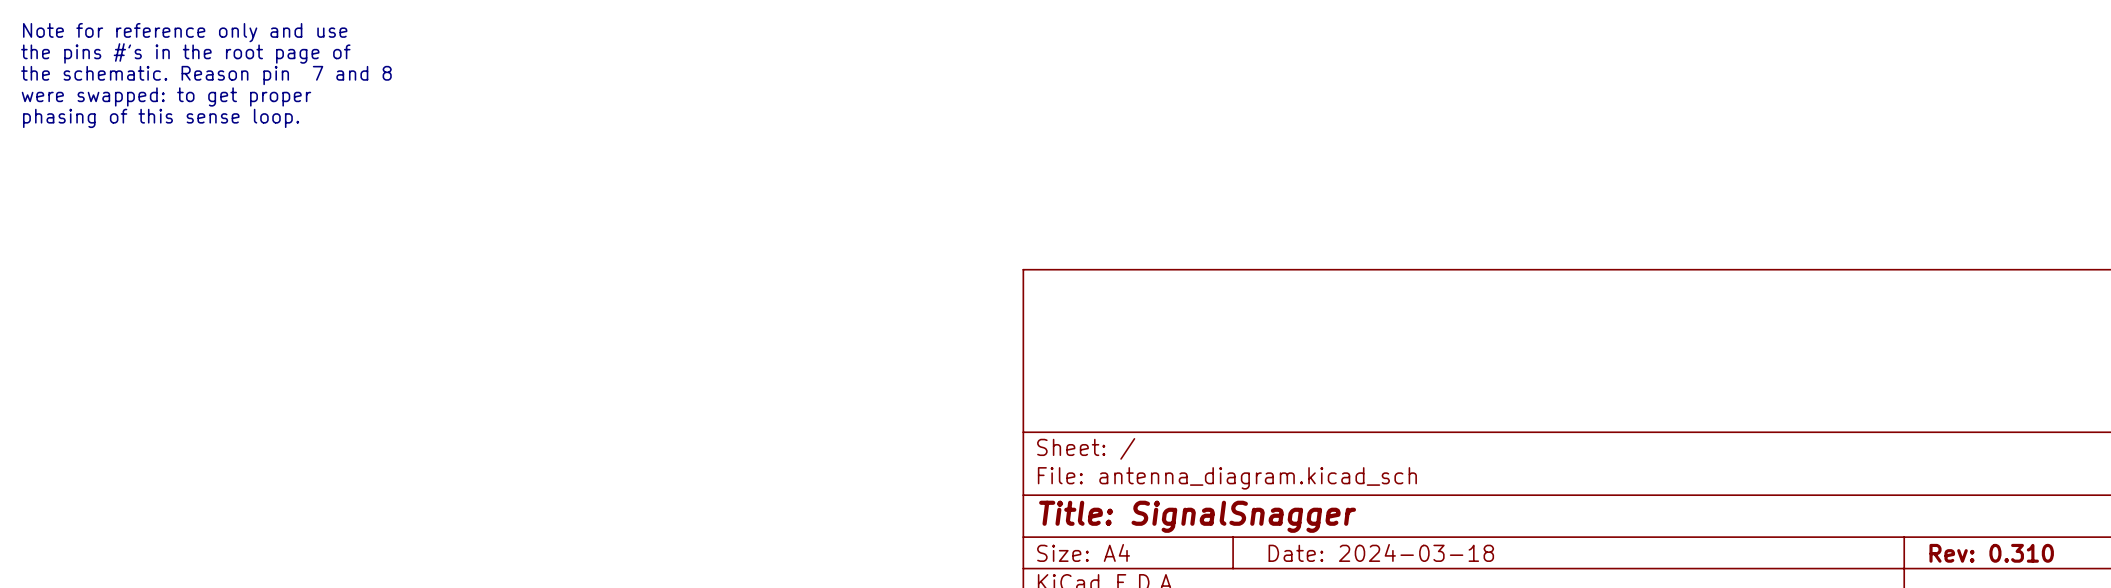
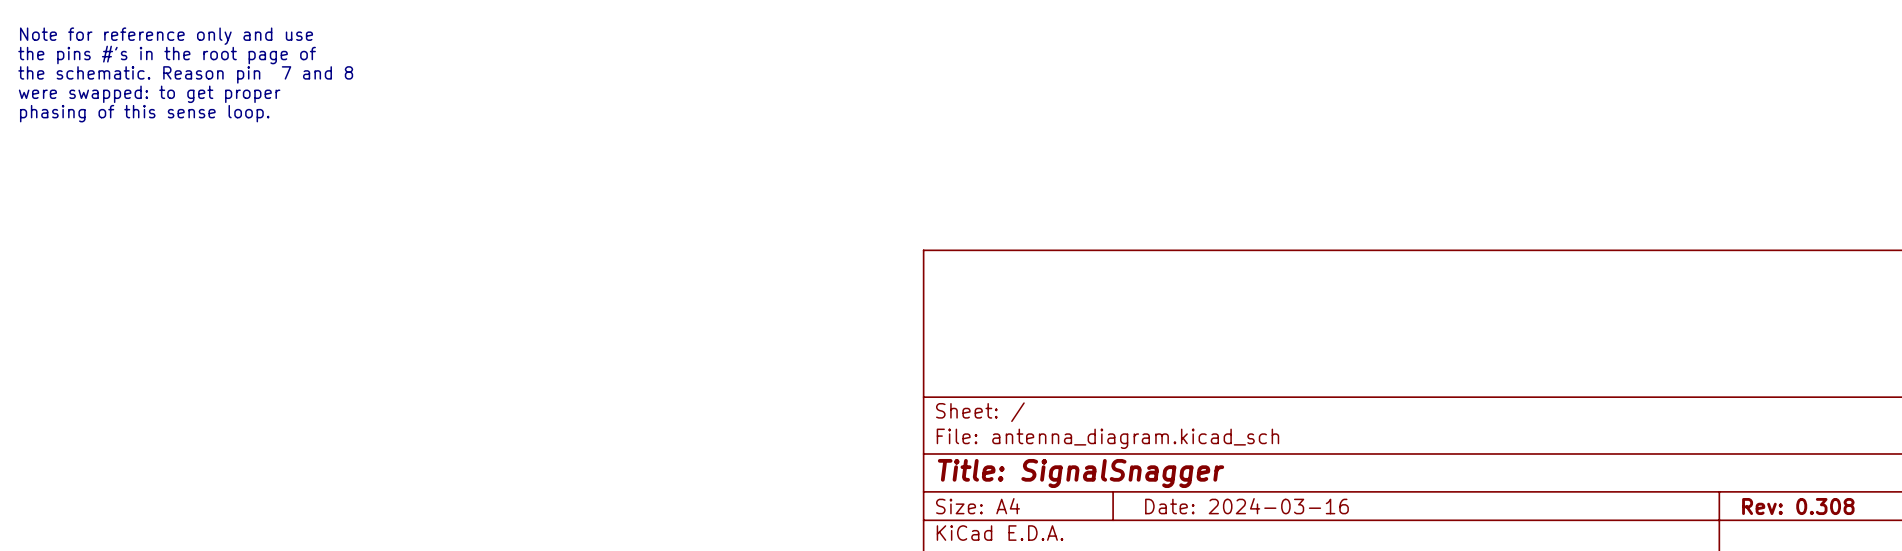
title block: Date: 2024-03-18 (1381, 552) -> Date: 2024-03-16 (1246, 506)
title block: Rev: 0.310 (1991, 553) -> Rev: 0.308 (1798, 506)

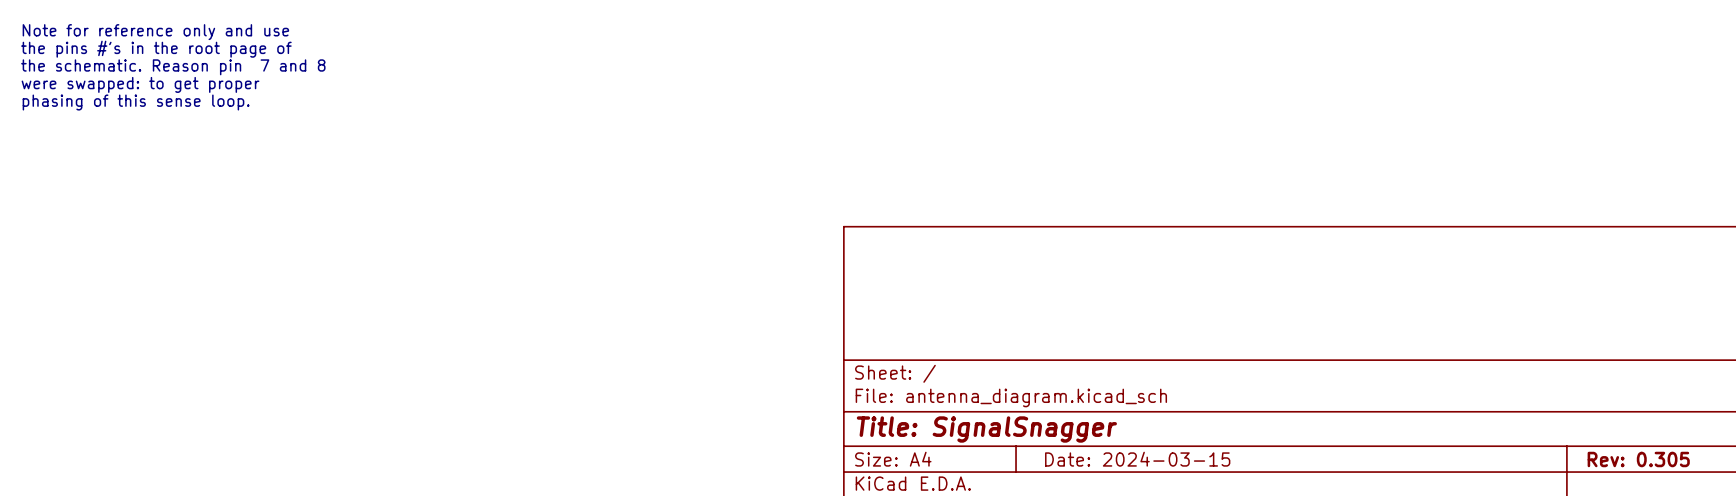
title block: Date: 2024-03-16 (1246, 506) -> Date: 2024-03-15 (1137, 459)
title block: Rev: 0.308 (1798, 506) -> Rev: 0.305 (1638, 459)

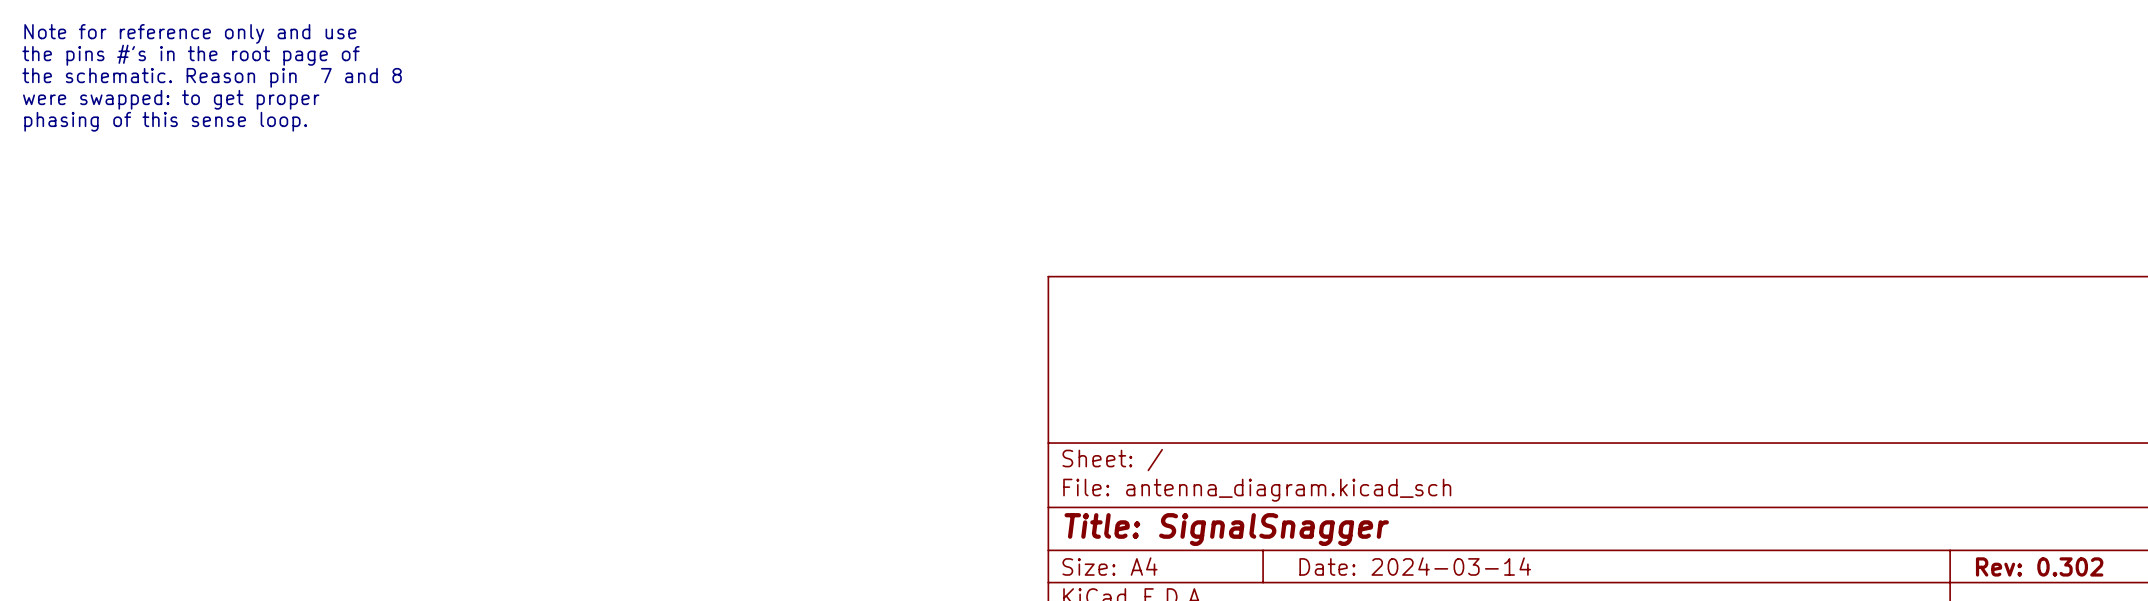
title block: Date: 2024-03-15 (1137, 459) -> Date: 2024-03-14 (1415, 566)
title block: Rev: 0.305 (1638, 459) -> Rev: 0.302 (2039, 566)

